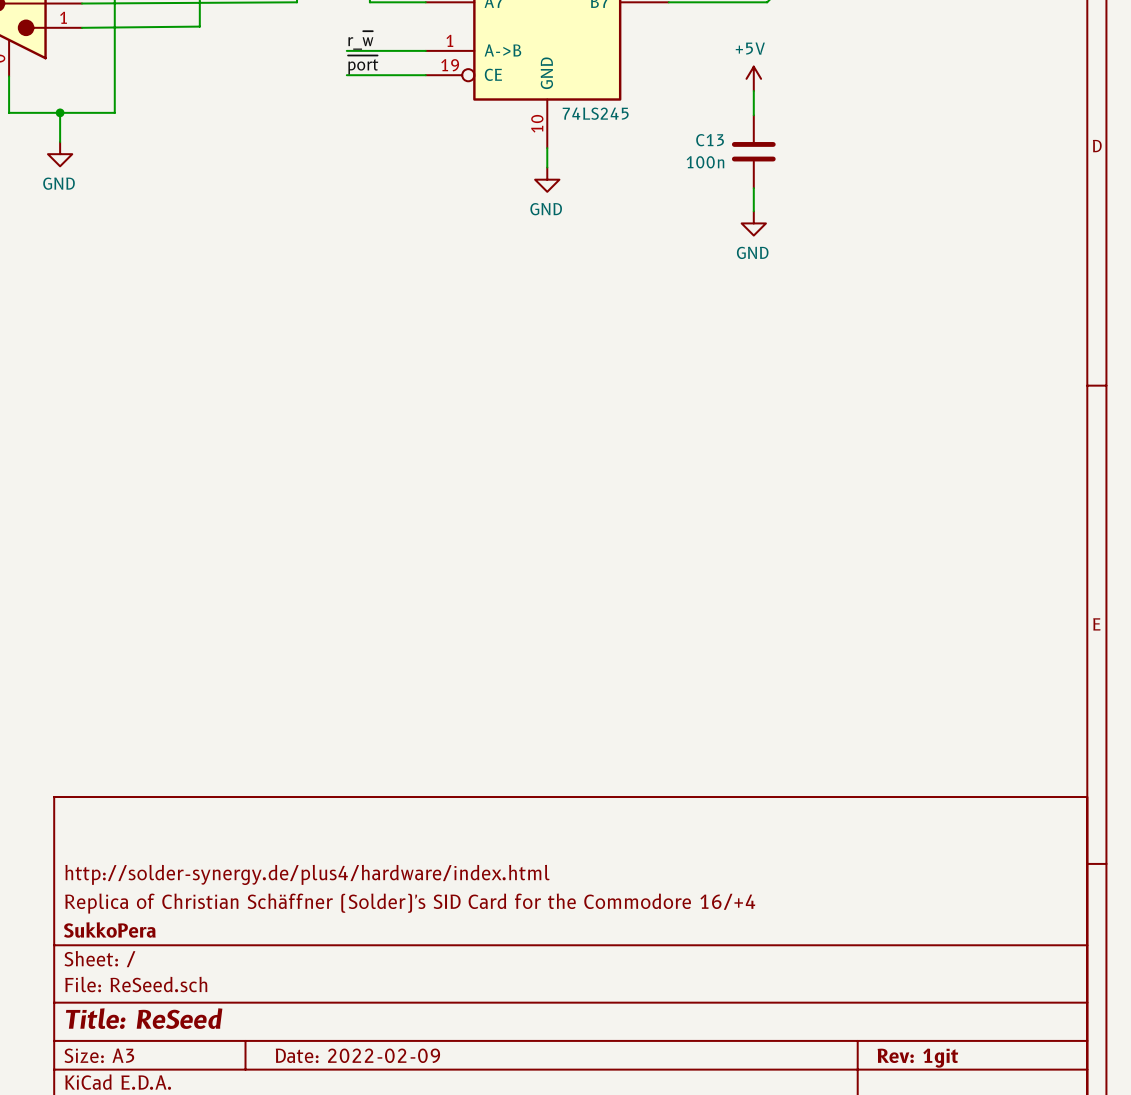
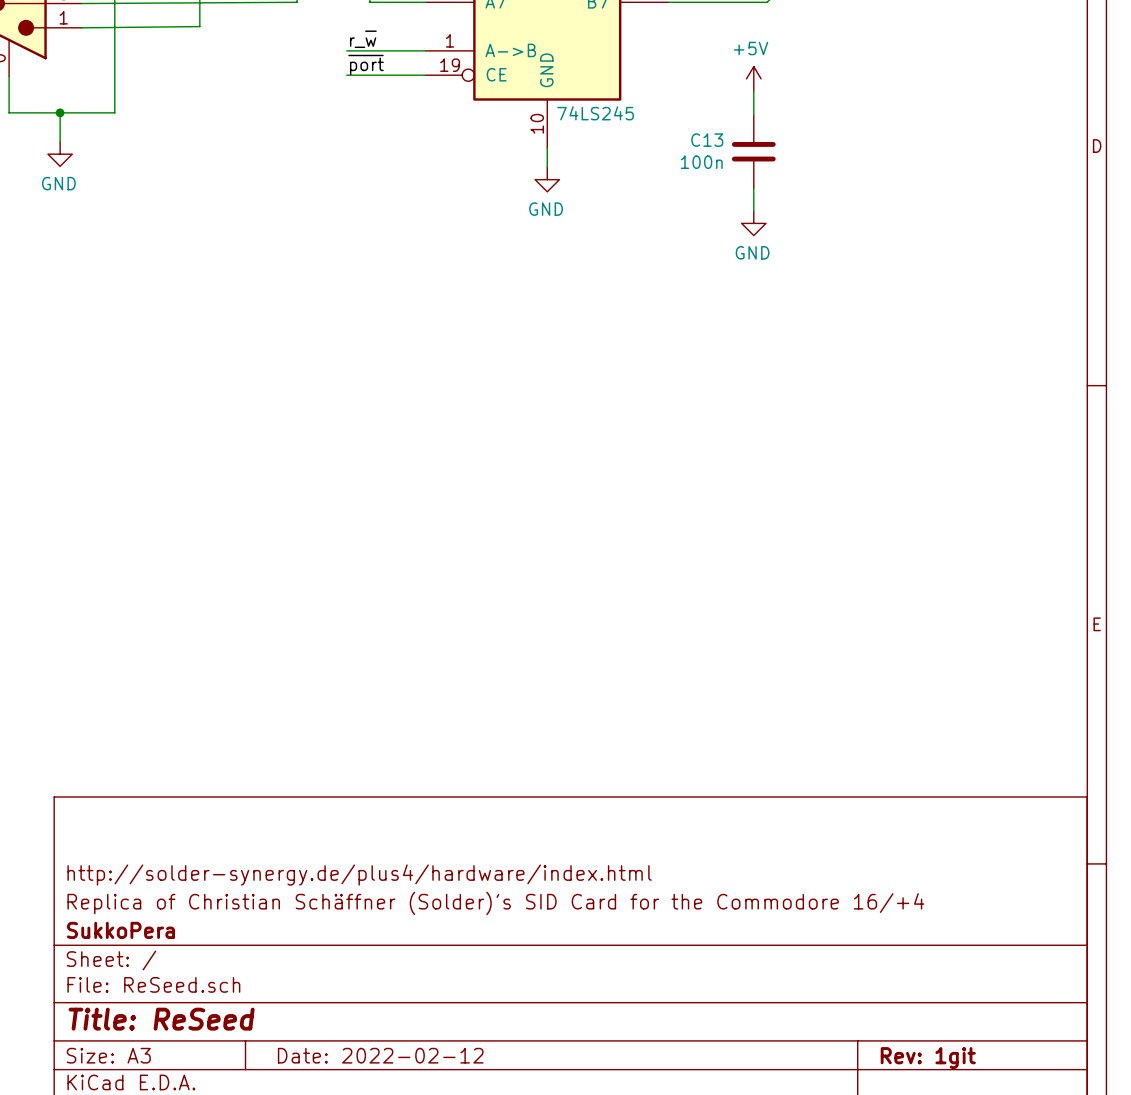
title block: Date: 2022-02-09 (357, 1055) -> Date: 2022-02-12 (380, 1055)

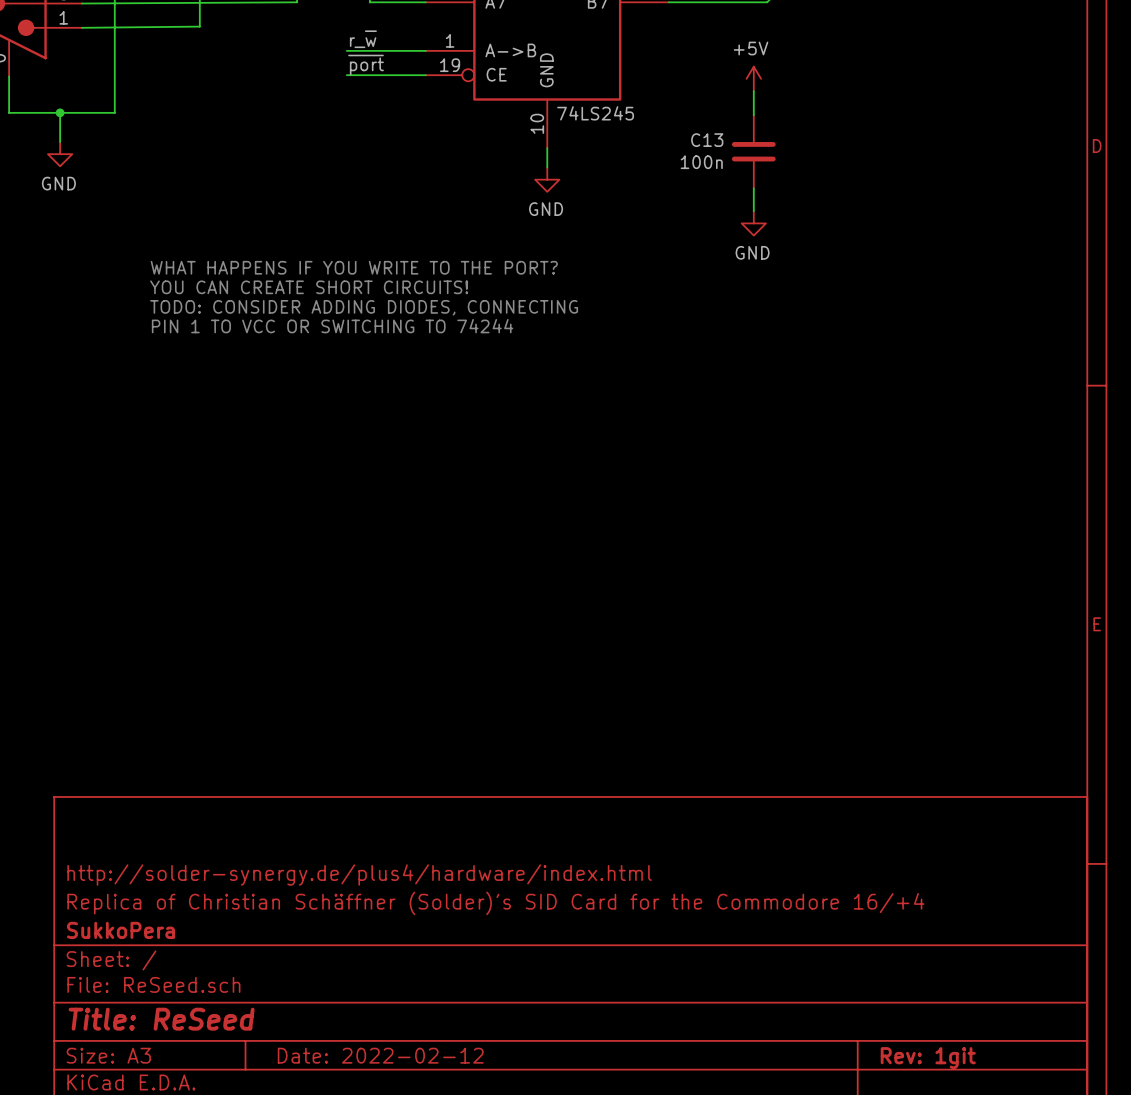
text: none -> WHAT HAPPENS IF YOU WRITE TO THE PORT? (354, 267)
text: none -> YOU CAN CREATE SHORT CIRCUITS! (309, 287)
text: none -> TODO: CONSIDER ADDING DIODES, CONNECTING (364, 307)
text: none -> PIN 1 TO VCC OR SWITCHING TO 74244 (332, 326)

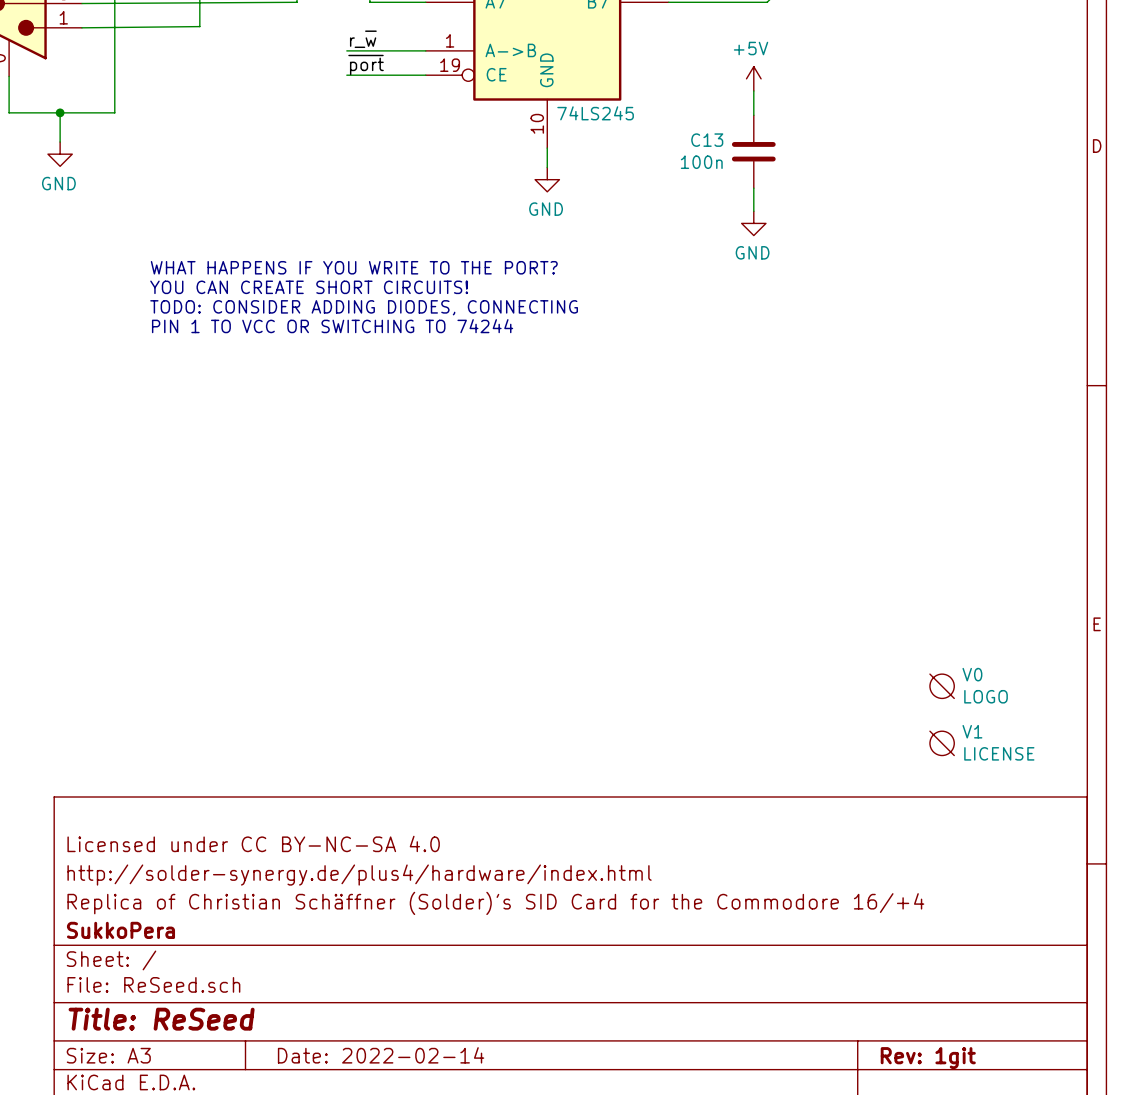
V0: none -> LOGO (942, 686)
V1: none -> LICENSE (942, 743)
title block: none -> Licensed under CC BY-NC-SA 4.0 (253, 843)
title block: Date: 2022-02-12 (380, 1055) -> Date: 2022-02-14 (381, 1055)

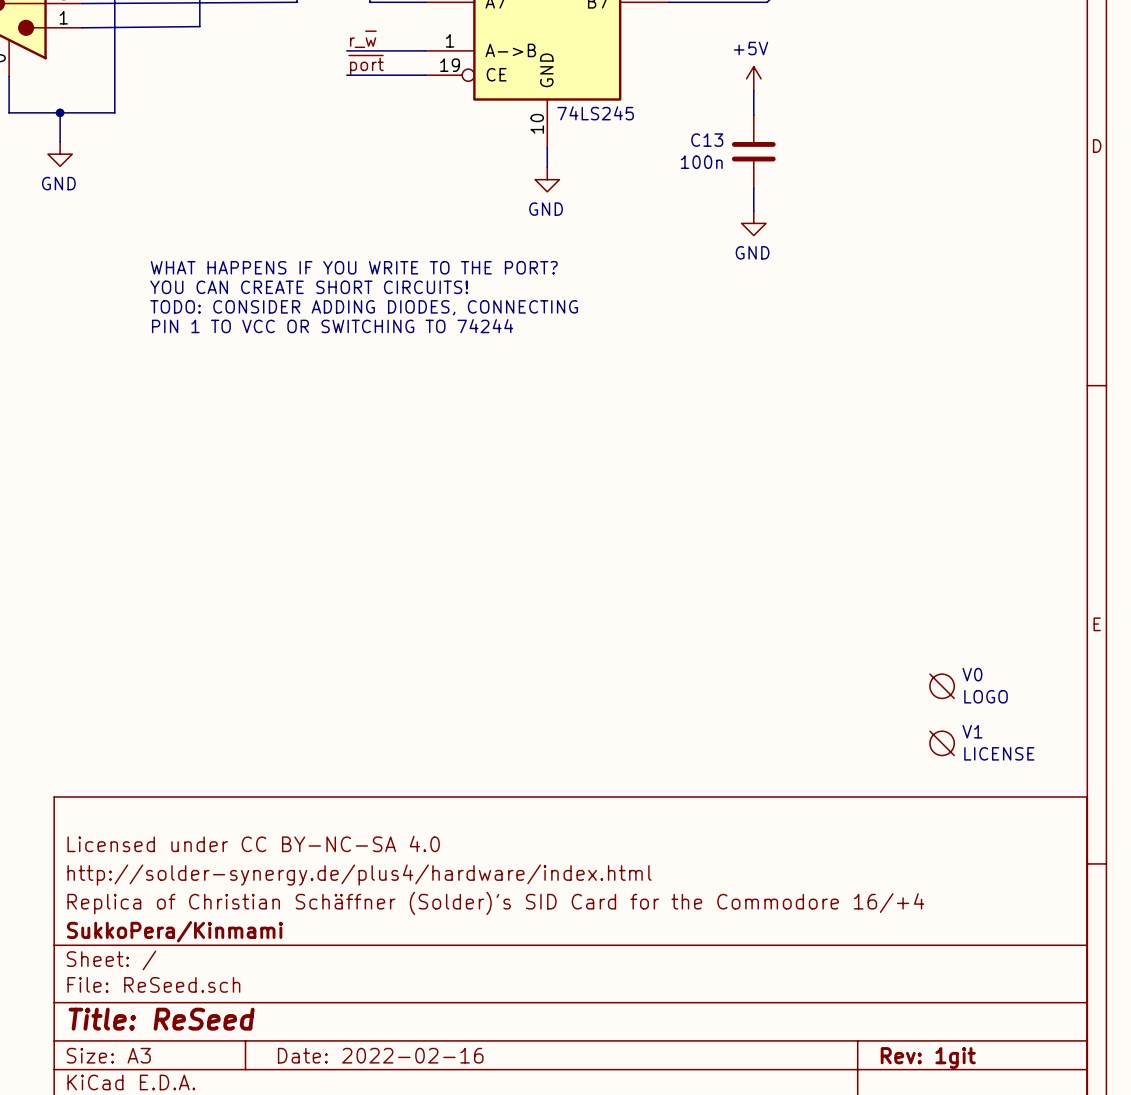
title block: SukkoPera (120, 930) -> SukkoPera/Kinmami (174, 931)
title block: Date: 2022-02-14 (381, 1055) -> Date: 2022-02-16 (380, 1055)

